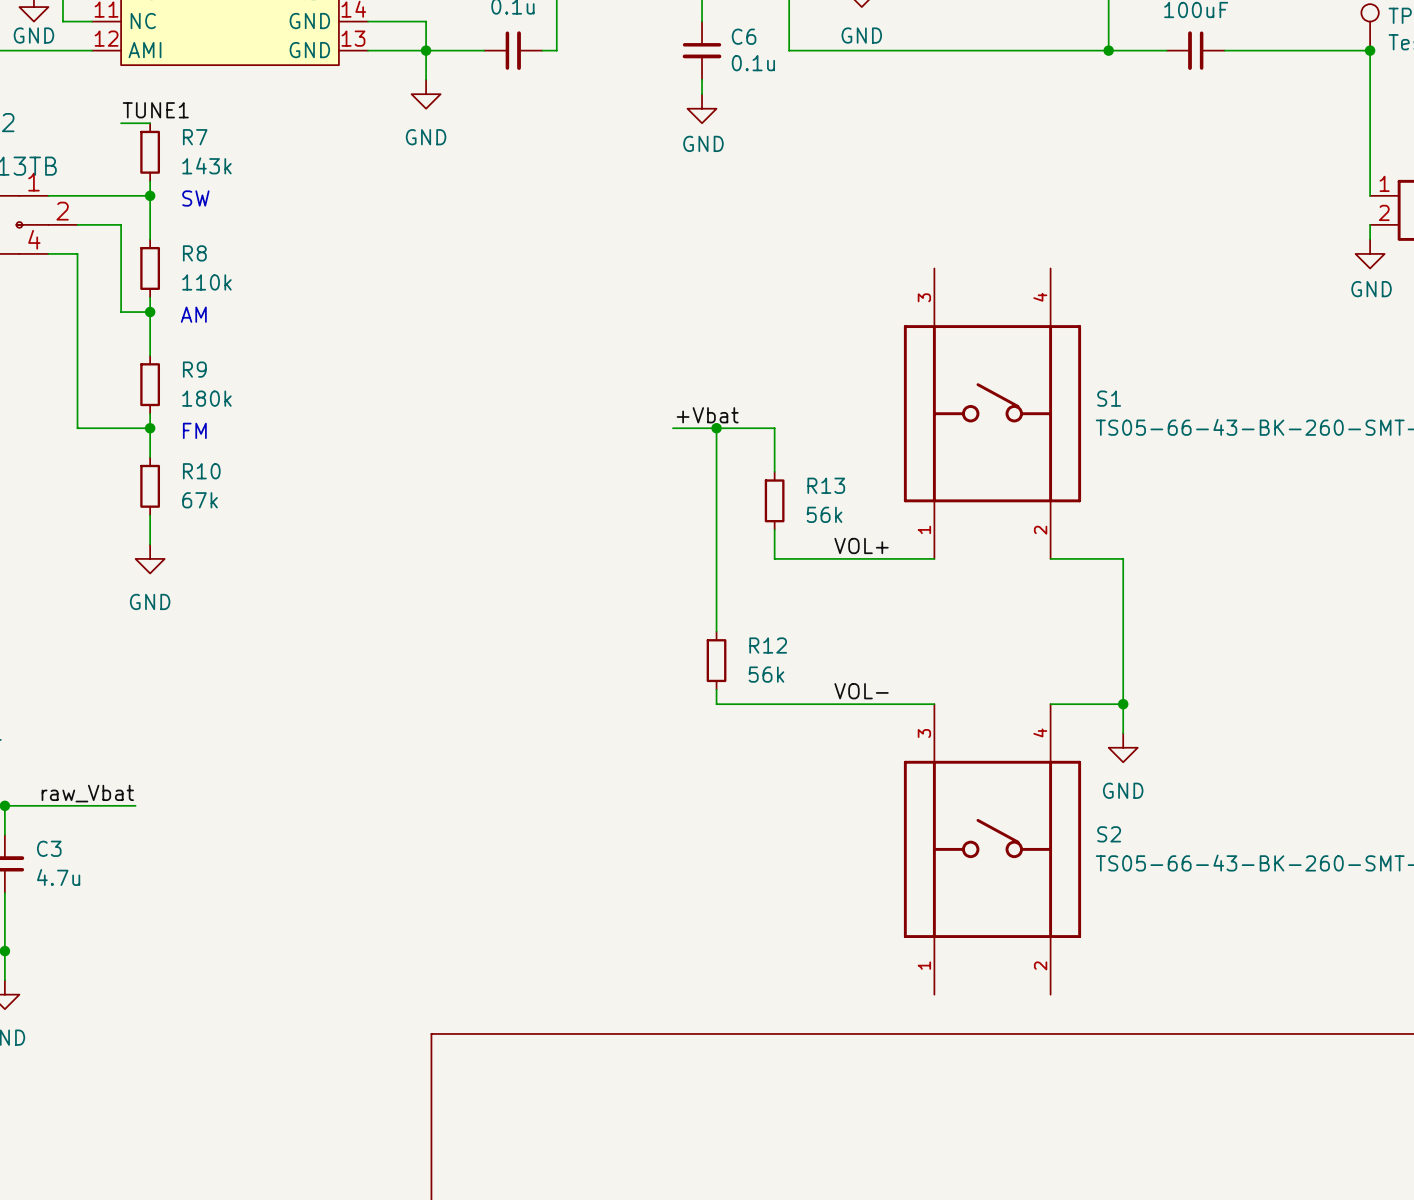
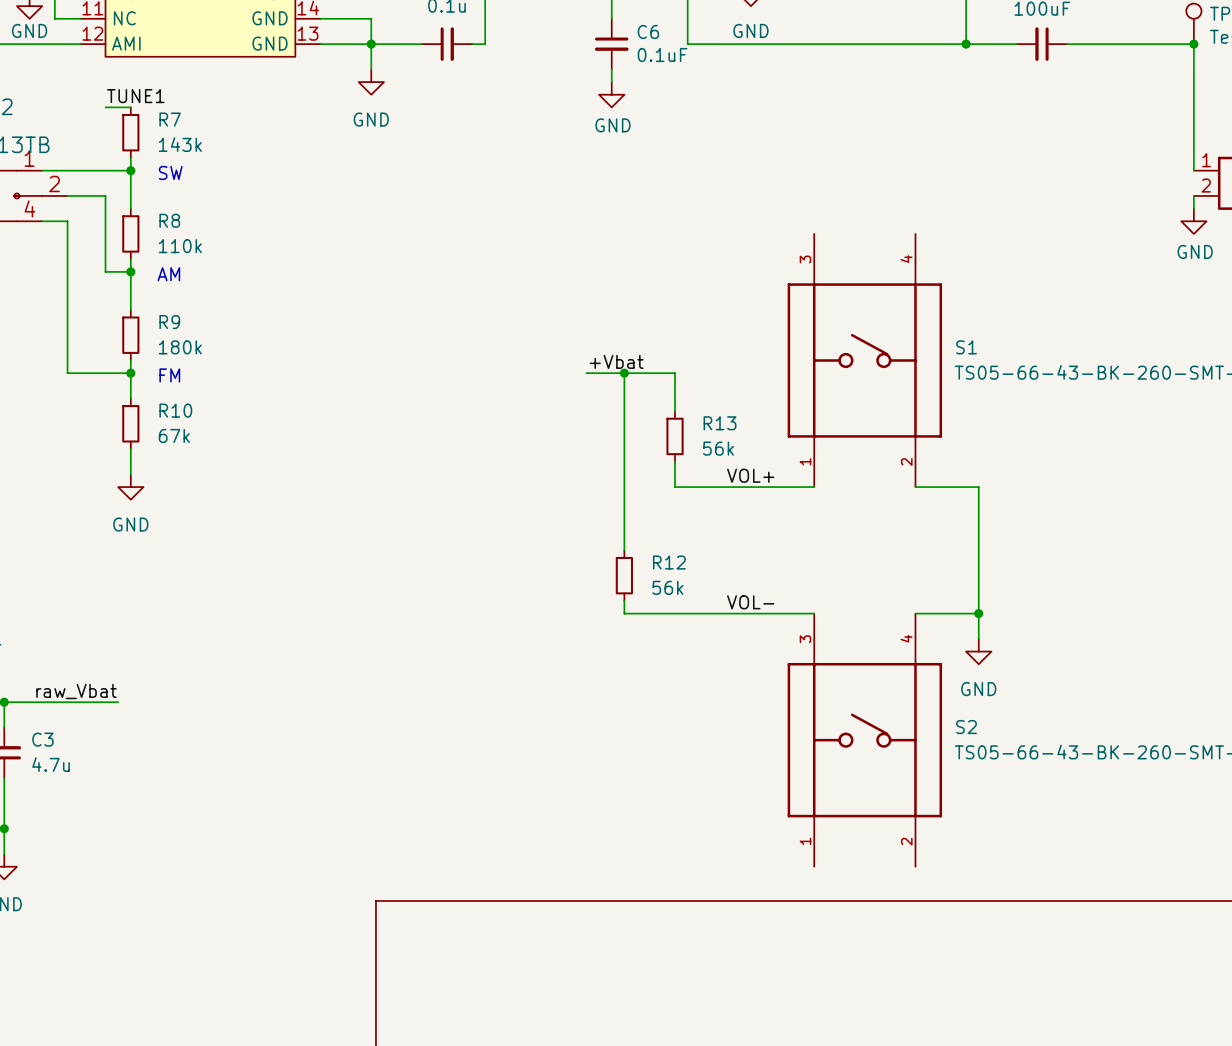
C6 value: 0.1u (753, 63) -> 0.1uF (662, 55)

